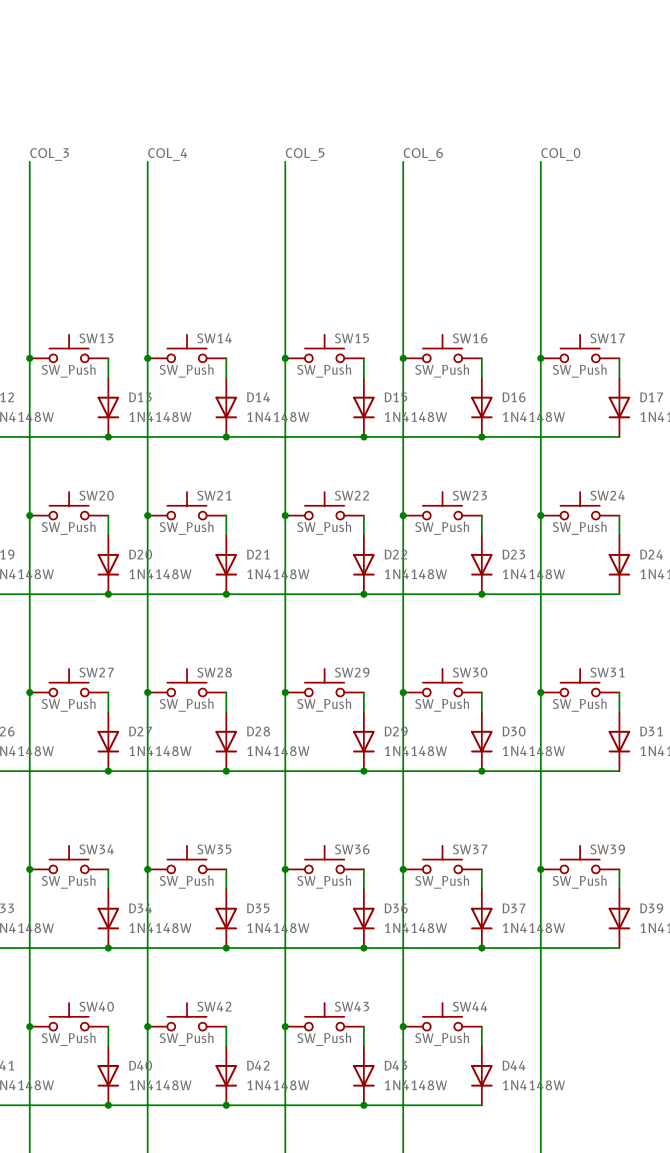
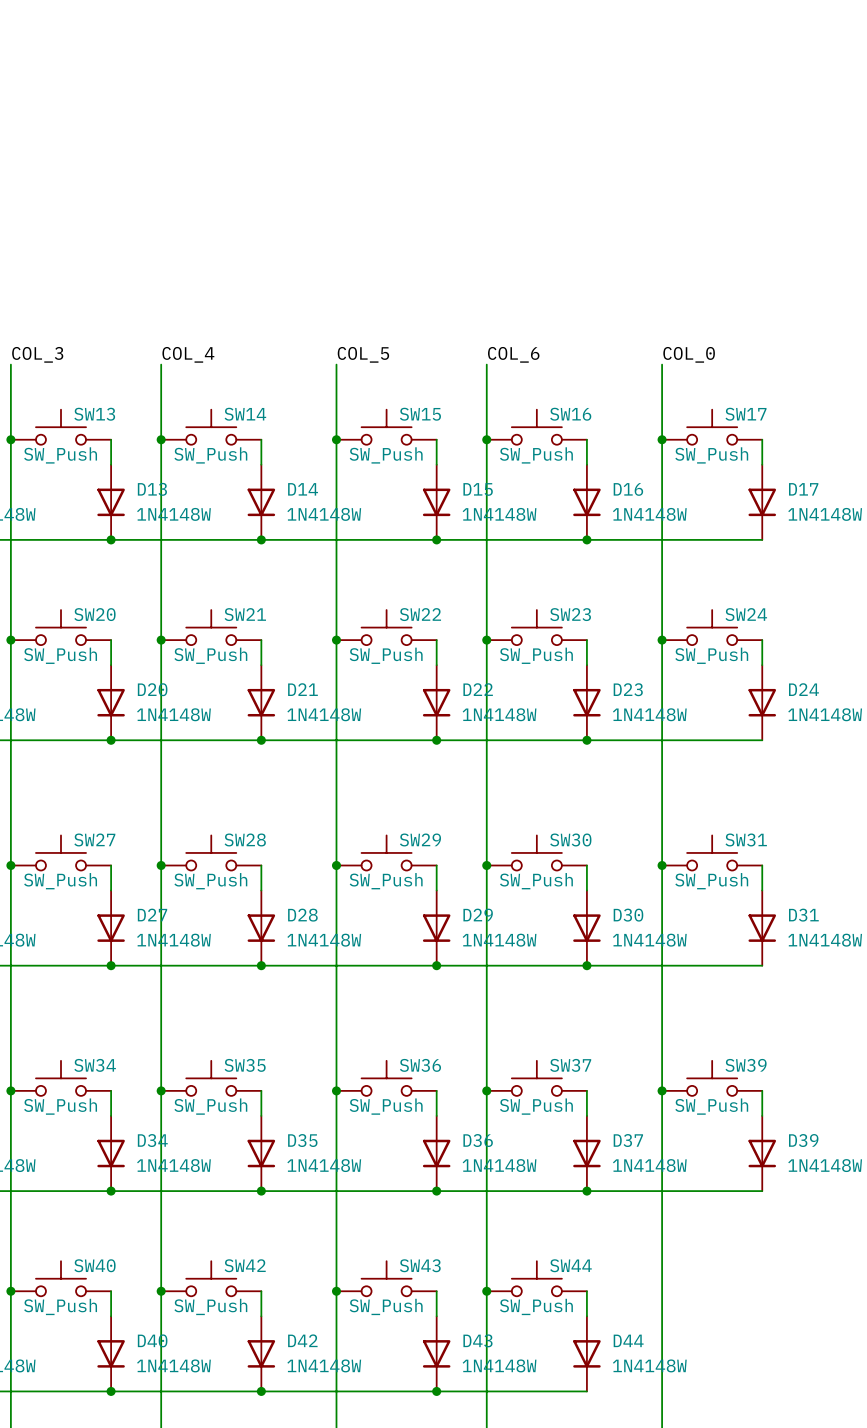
label position: COL_3 (49, 154) -> COL_3 (37, 354)
label position: COL_4 (167, 154) -> COL_4 (188, 354)
label position: COL_5 (305, 154) -> COL_5 (363, 354)
label position: COL_6 (423, 154) -> COL_6 (513, 354)
label position: COL_0 (560, 154) -> COL_0 (689, 354)
wire: (29, 161) (29, 299) -> none
wire: (147, 161) (147, 299) -> none
wire: (285, 161) (285, 299) -> none
wire: (403, 161) (403, 299) -> none
wire: (540, 161) (540, 299) -> none

